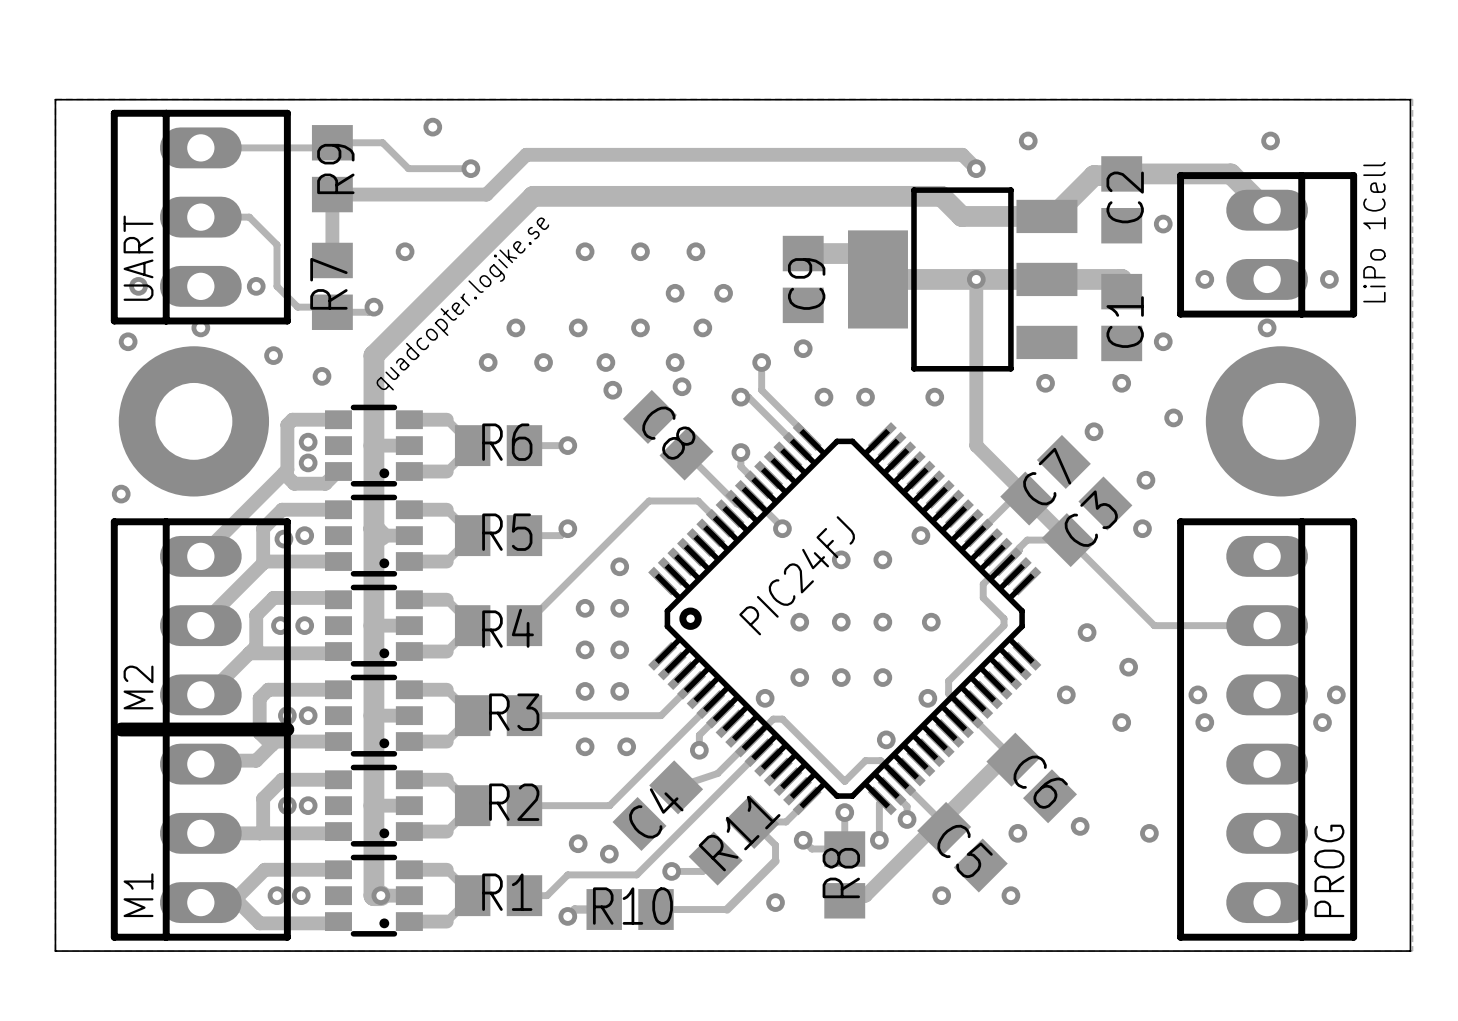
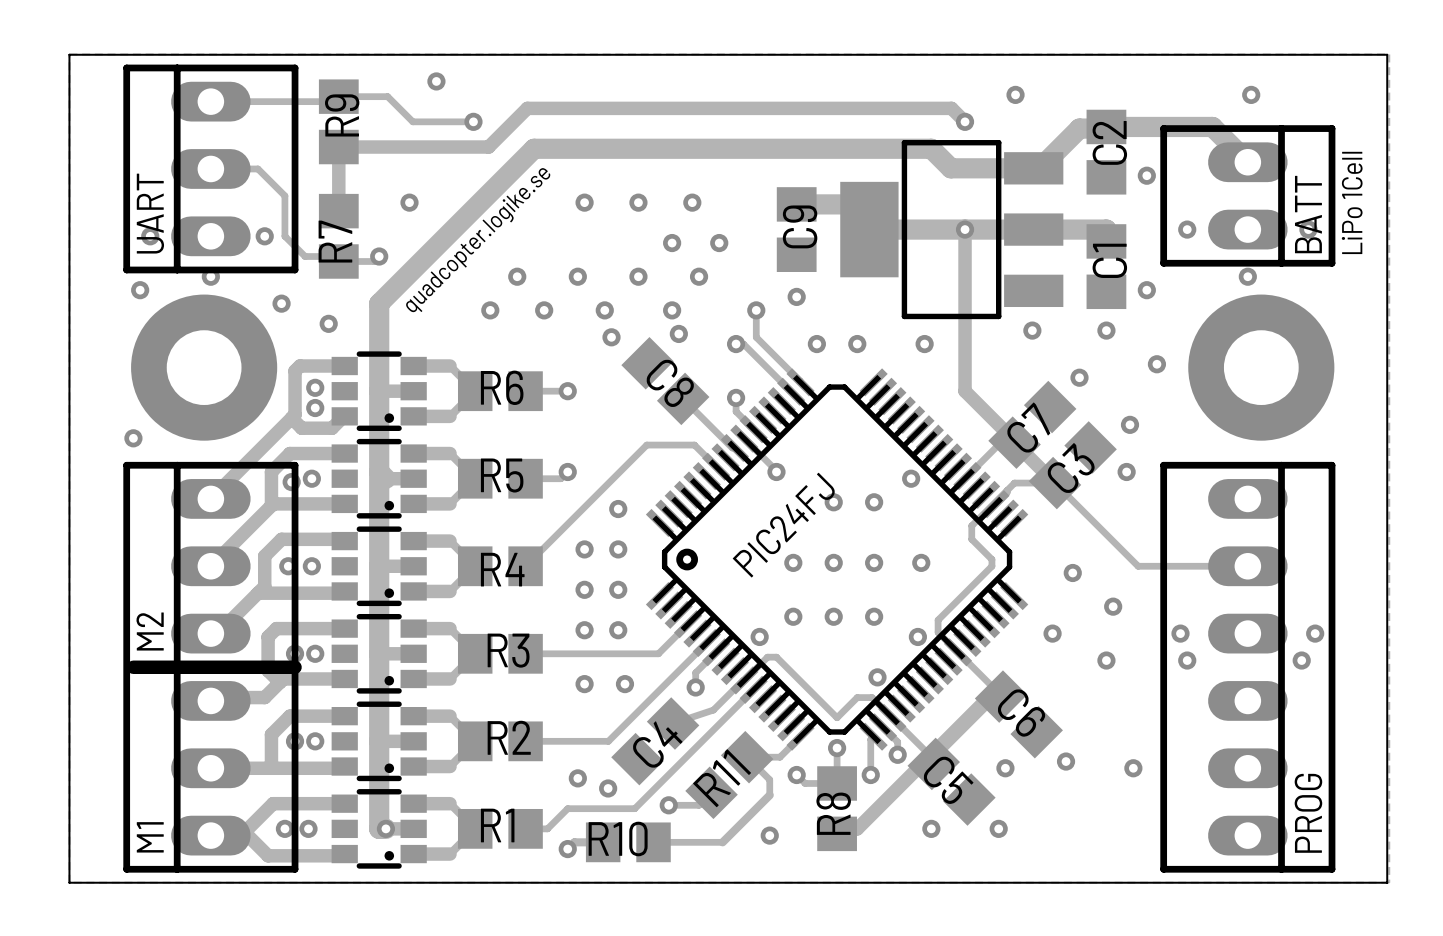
BATT name: none -> BATT (1308, 214)

